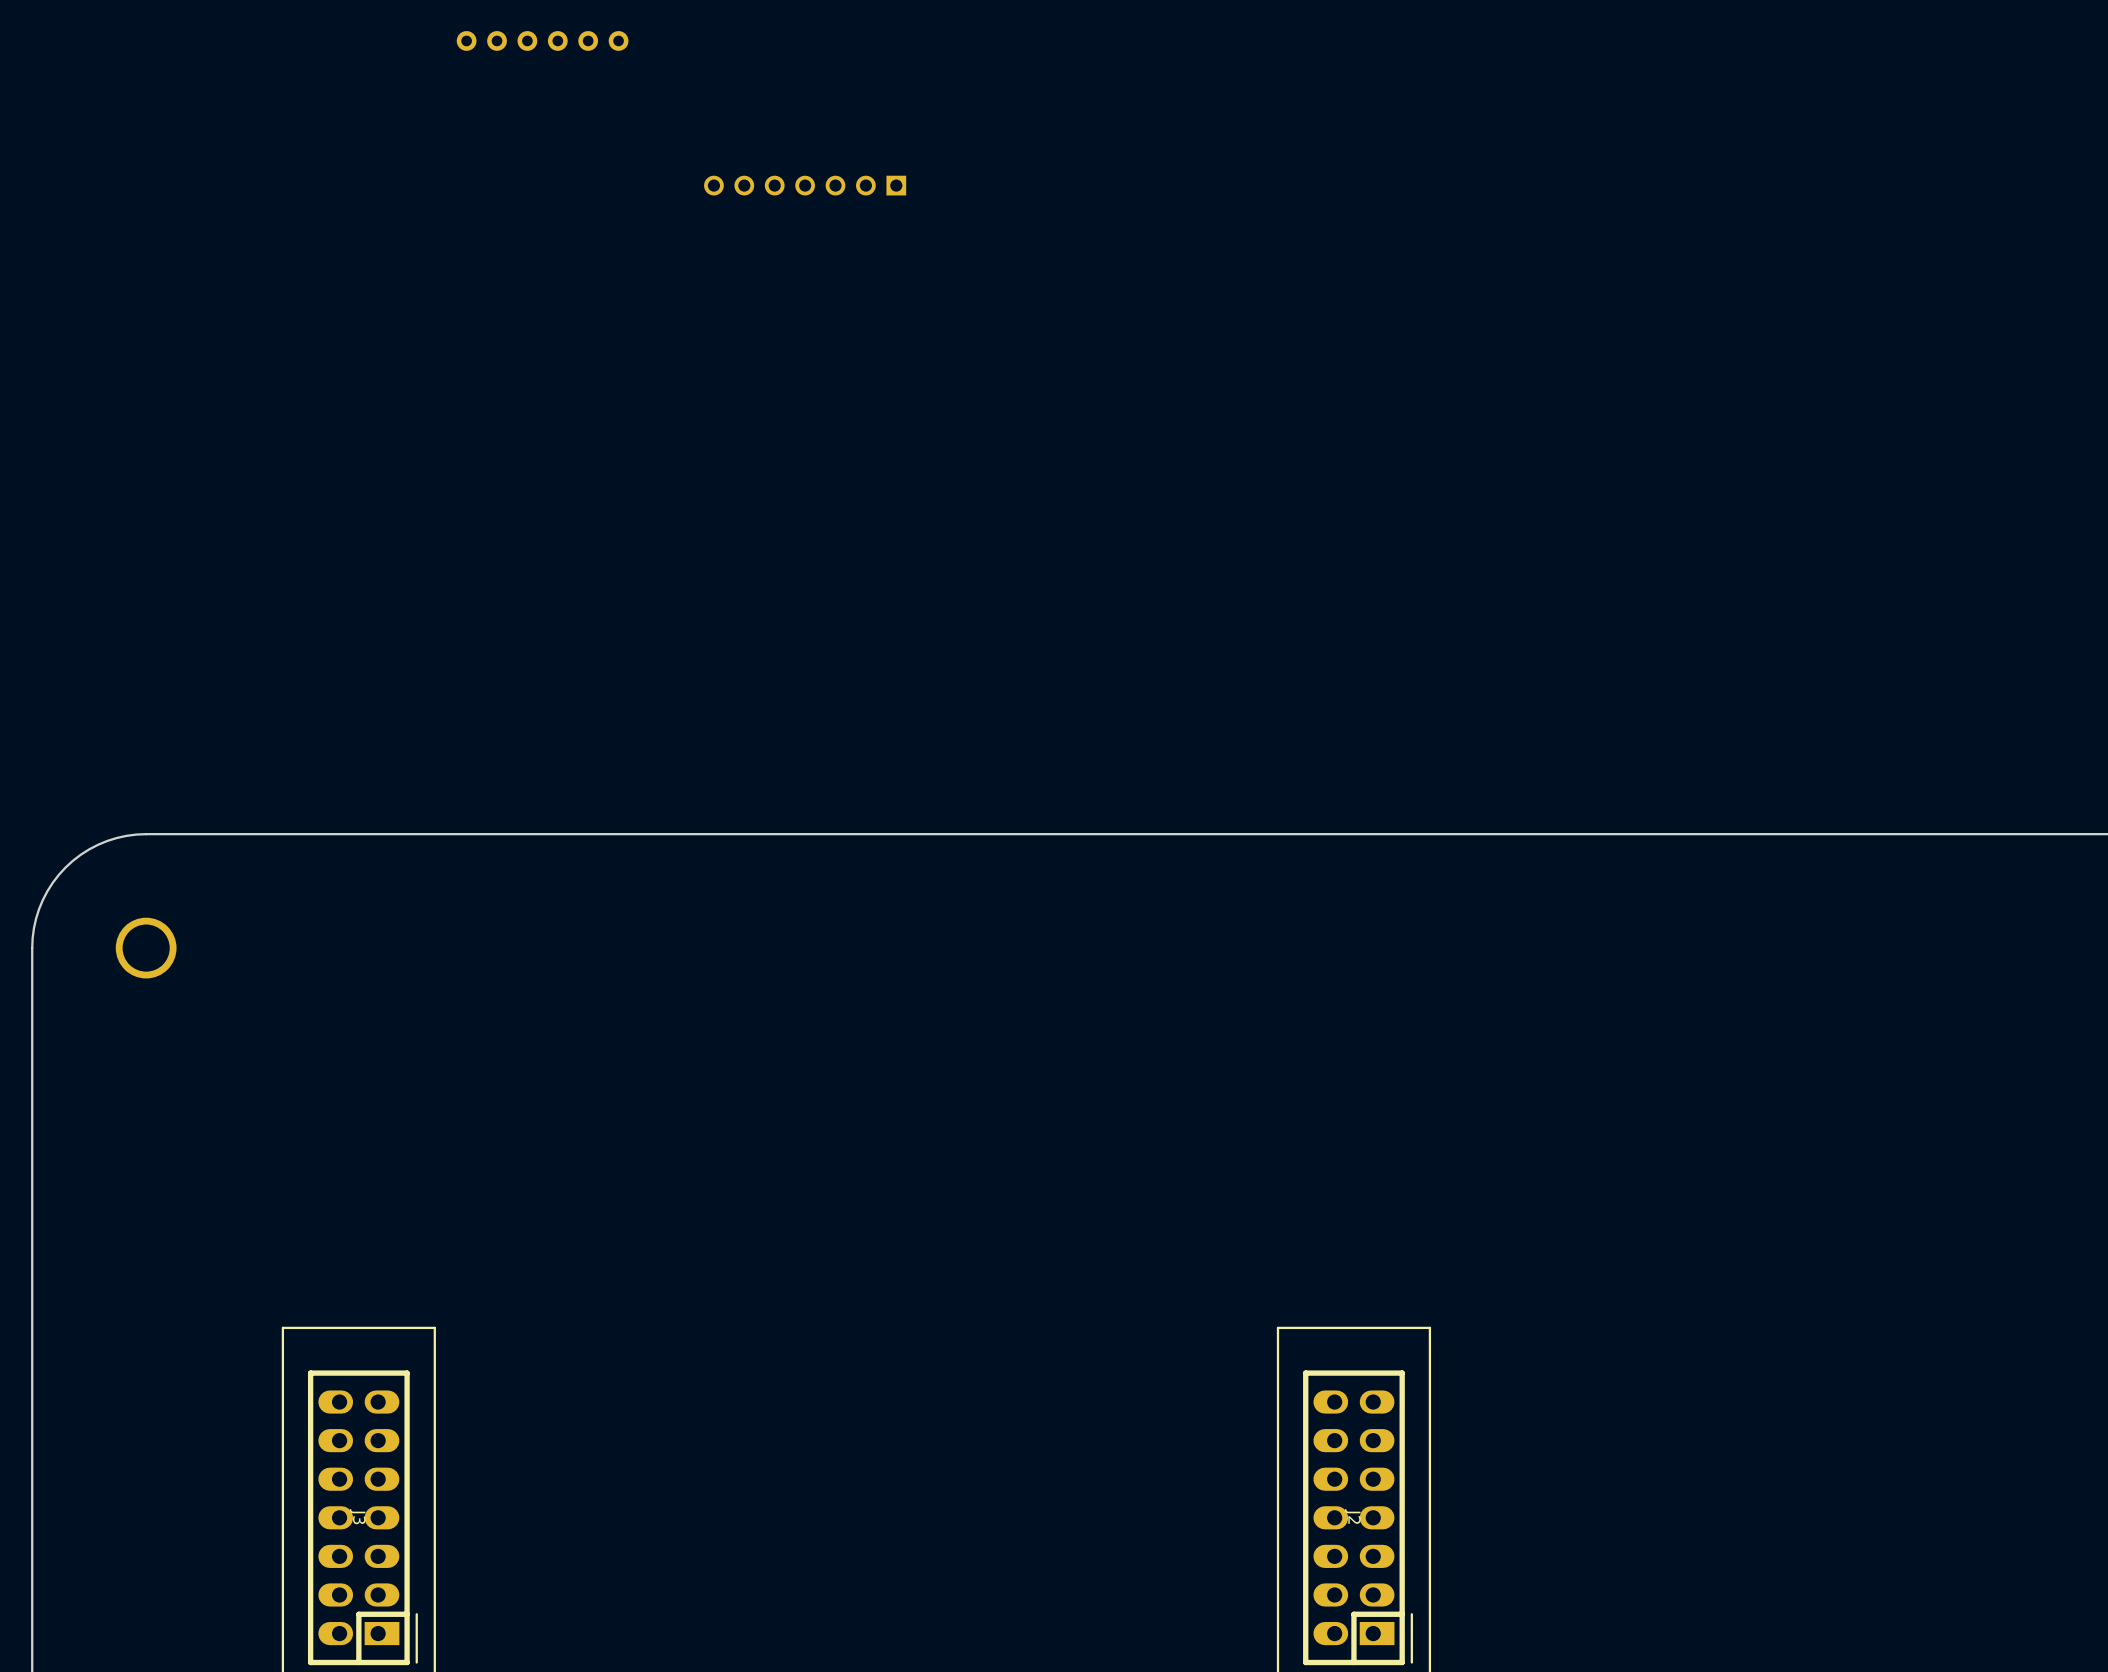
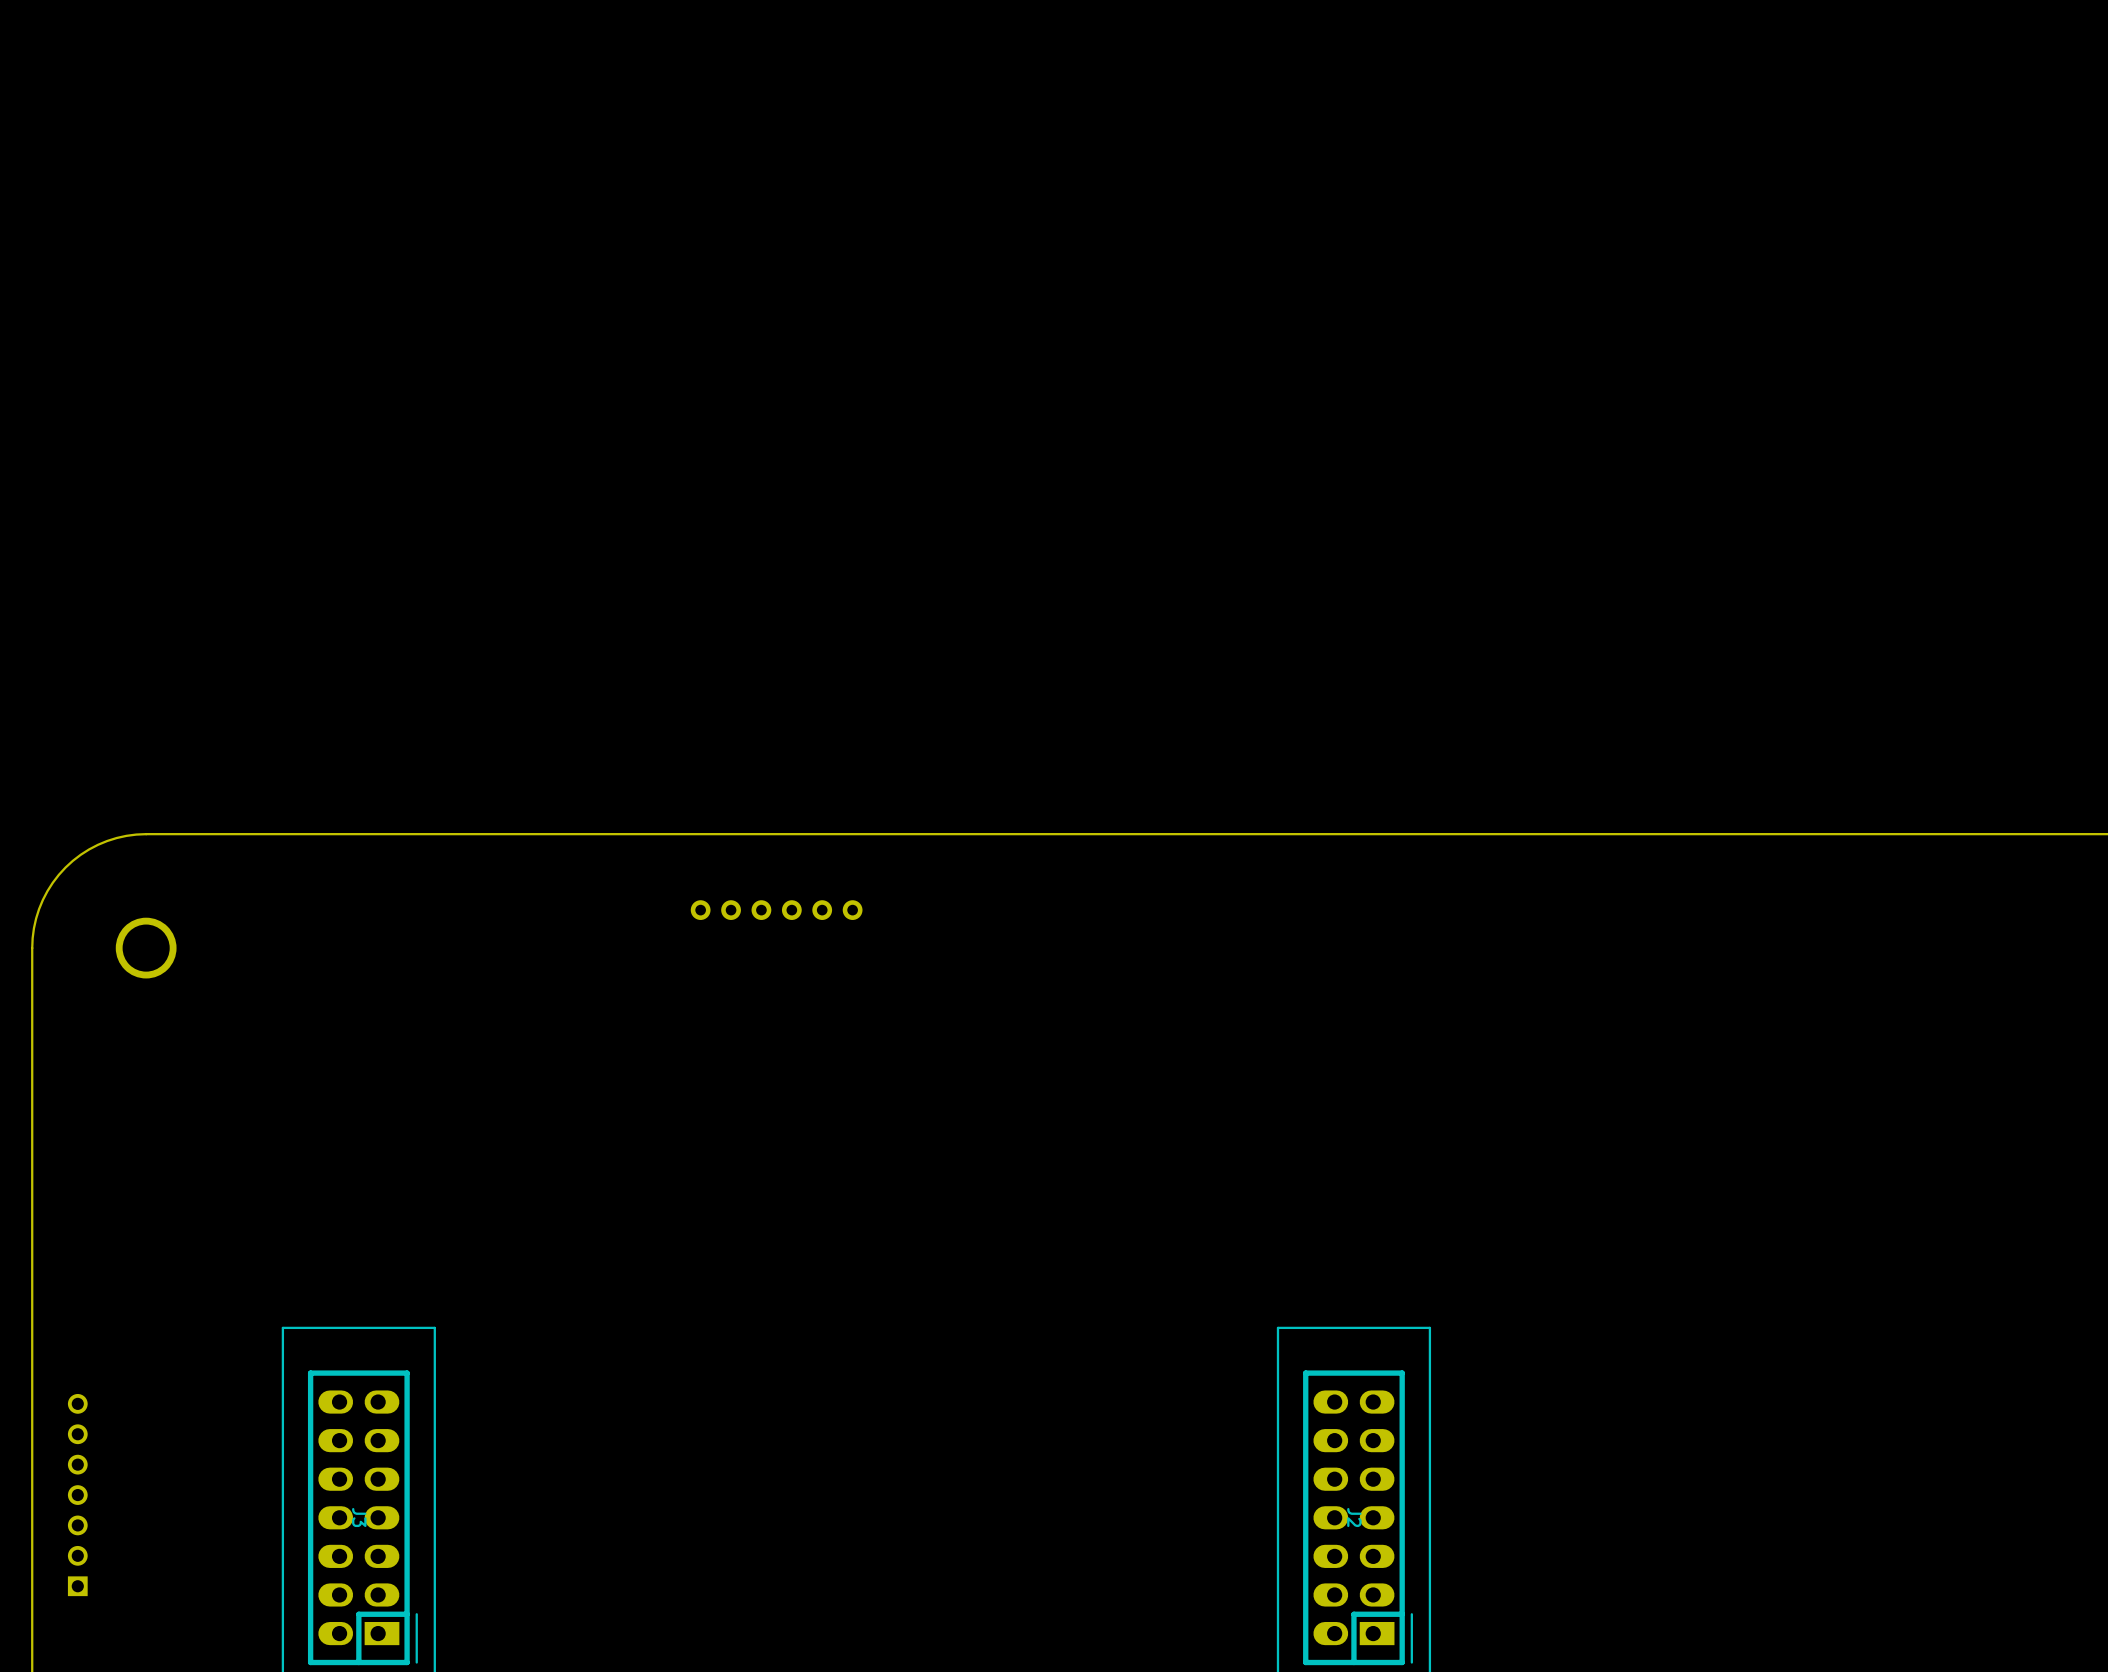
part: (542, 40) -> none
part: (805, 185) -> none
part: none -> (776, 910)
part: none -> (77, 1495)

